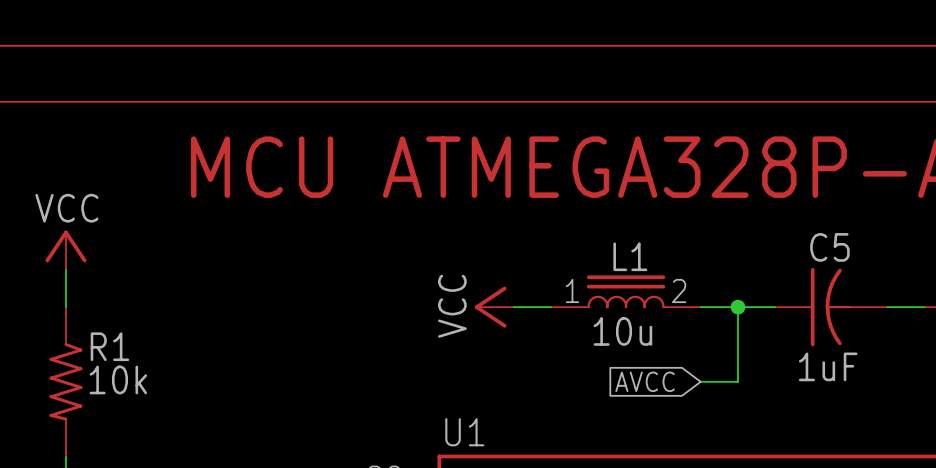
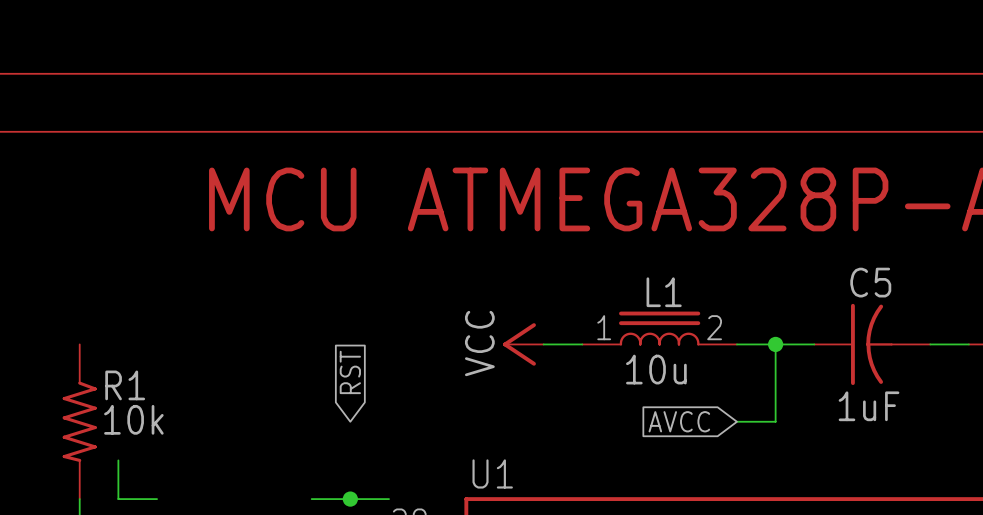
power symbol: VCC (66, 250) -> none
wire: (66, 269) (66, 307) -> none
global label: none -> RST (350, 372)
wire: none -> (118, 460) (118, 499) (157, 499)
wire: none -> (311, 499) (389, 499)
junction: none -> (350, 499)

